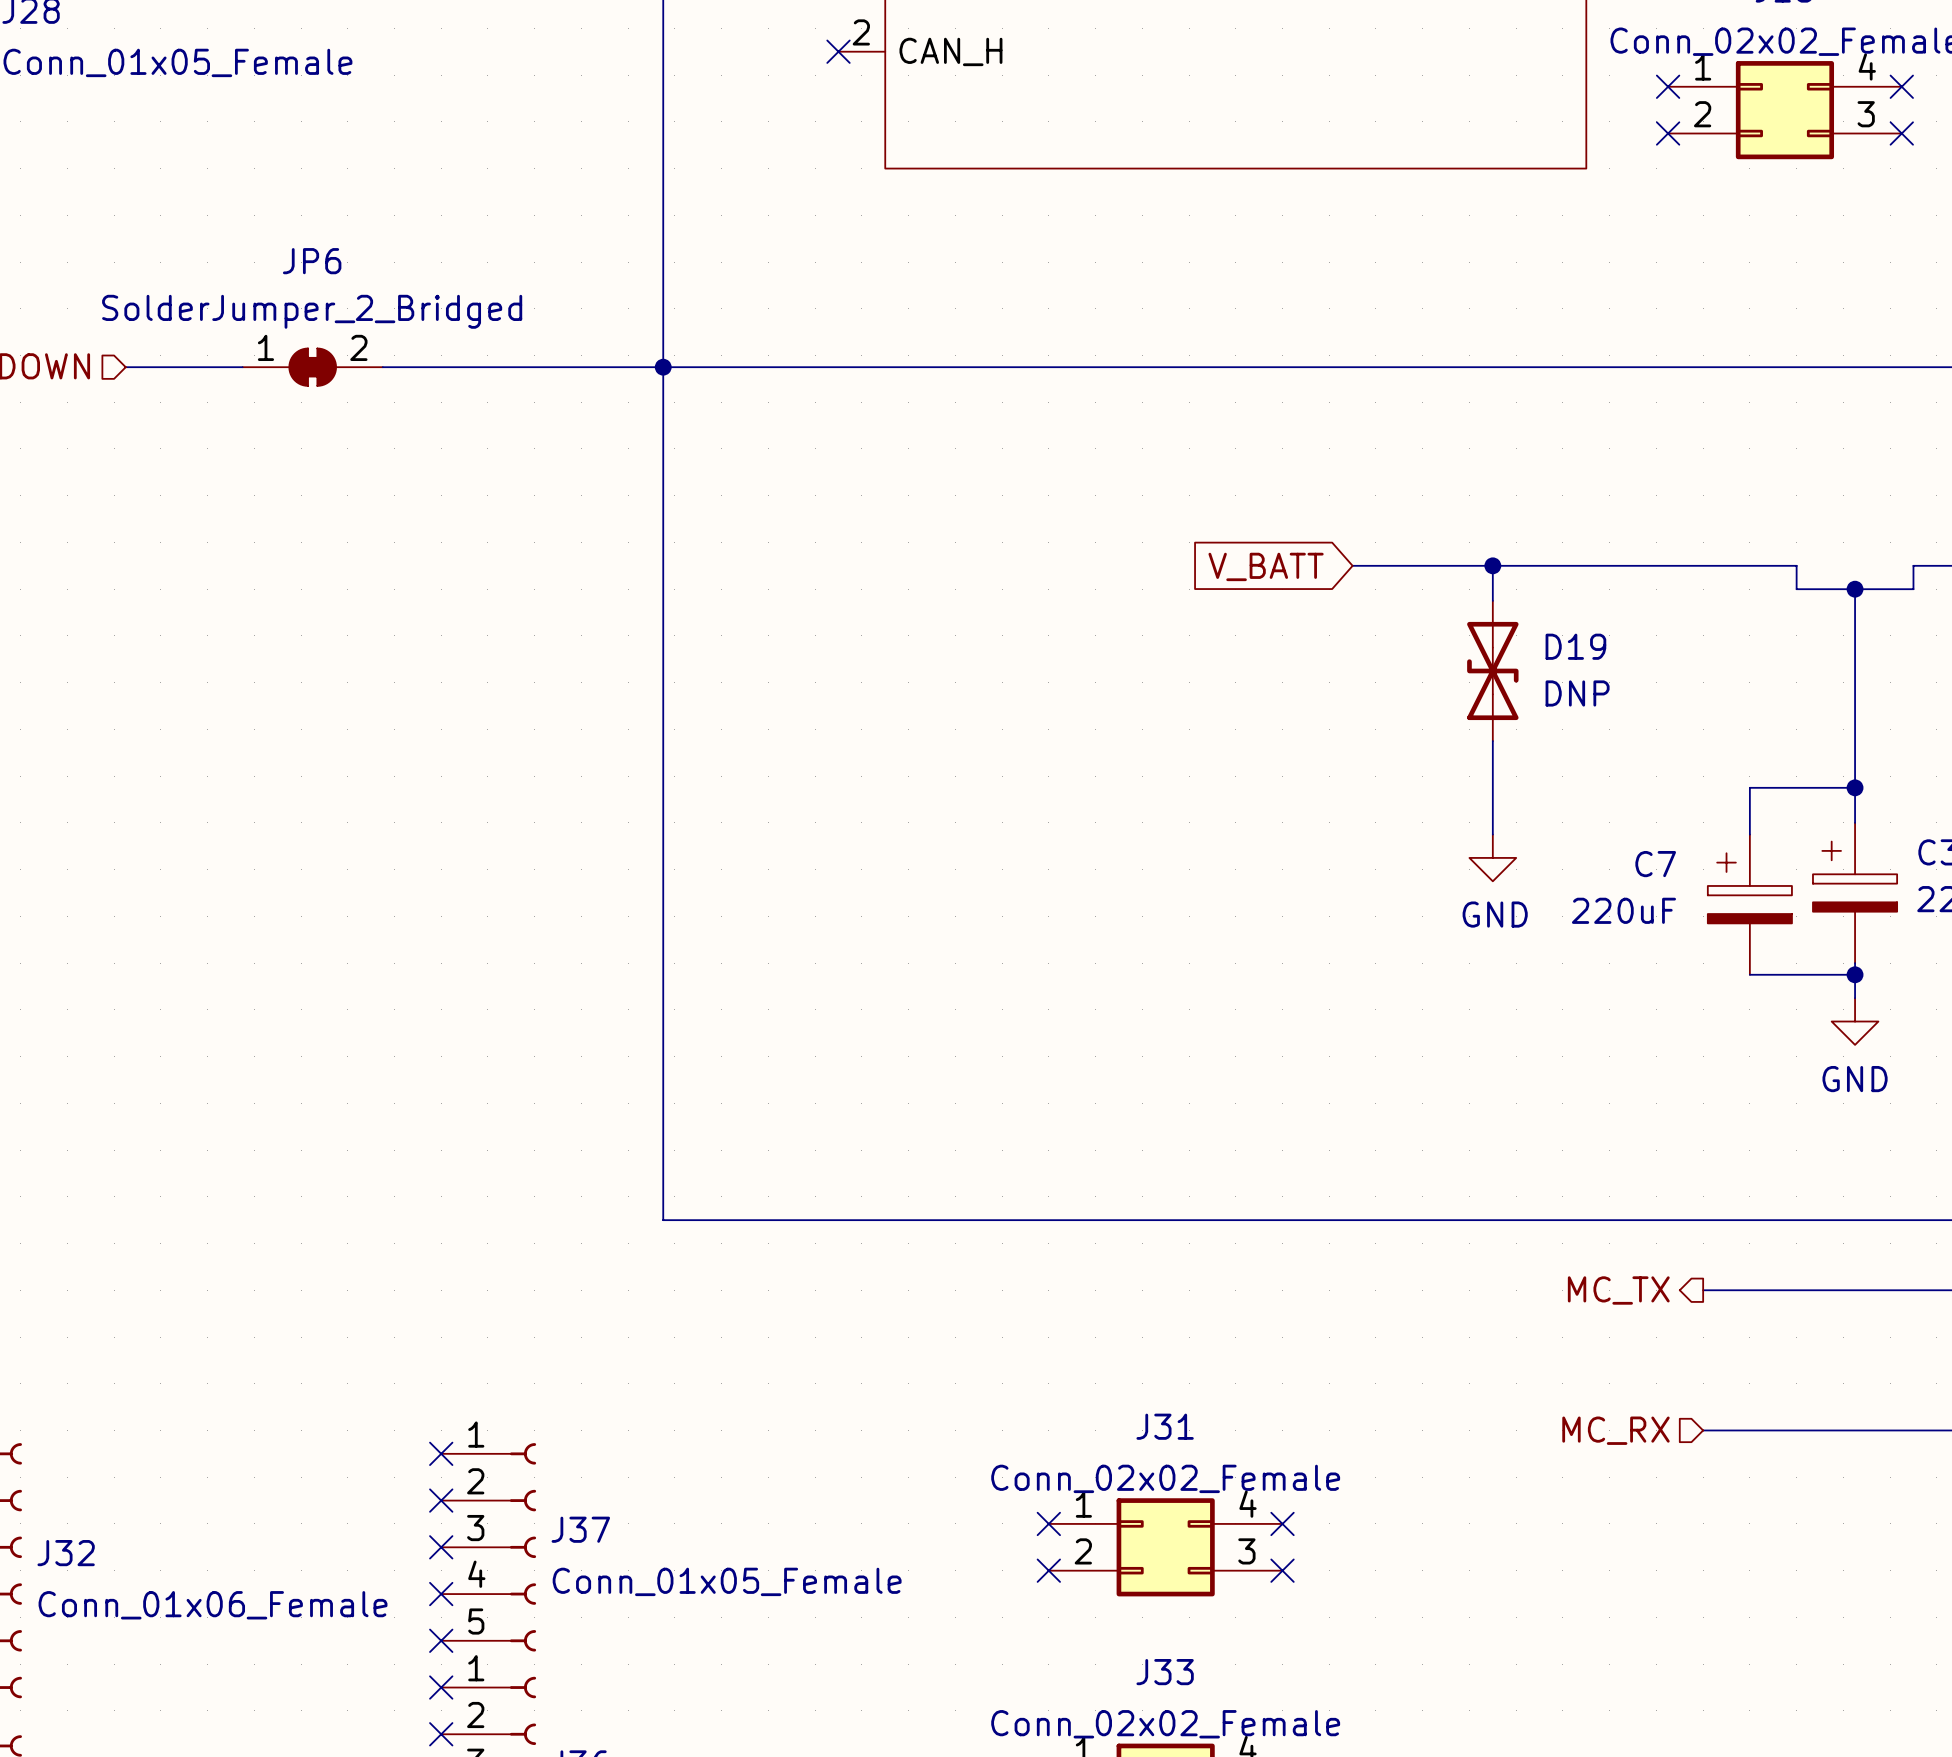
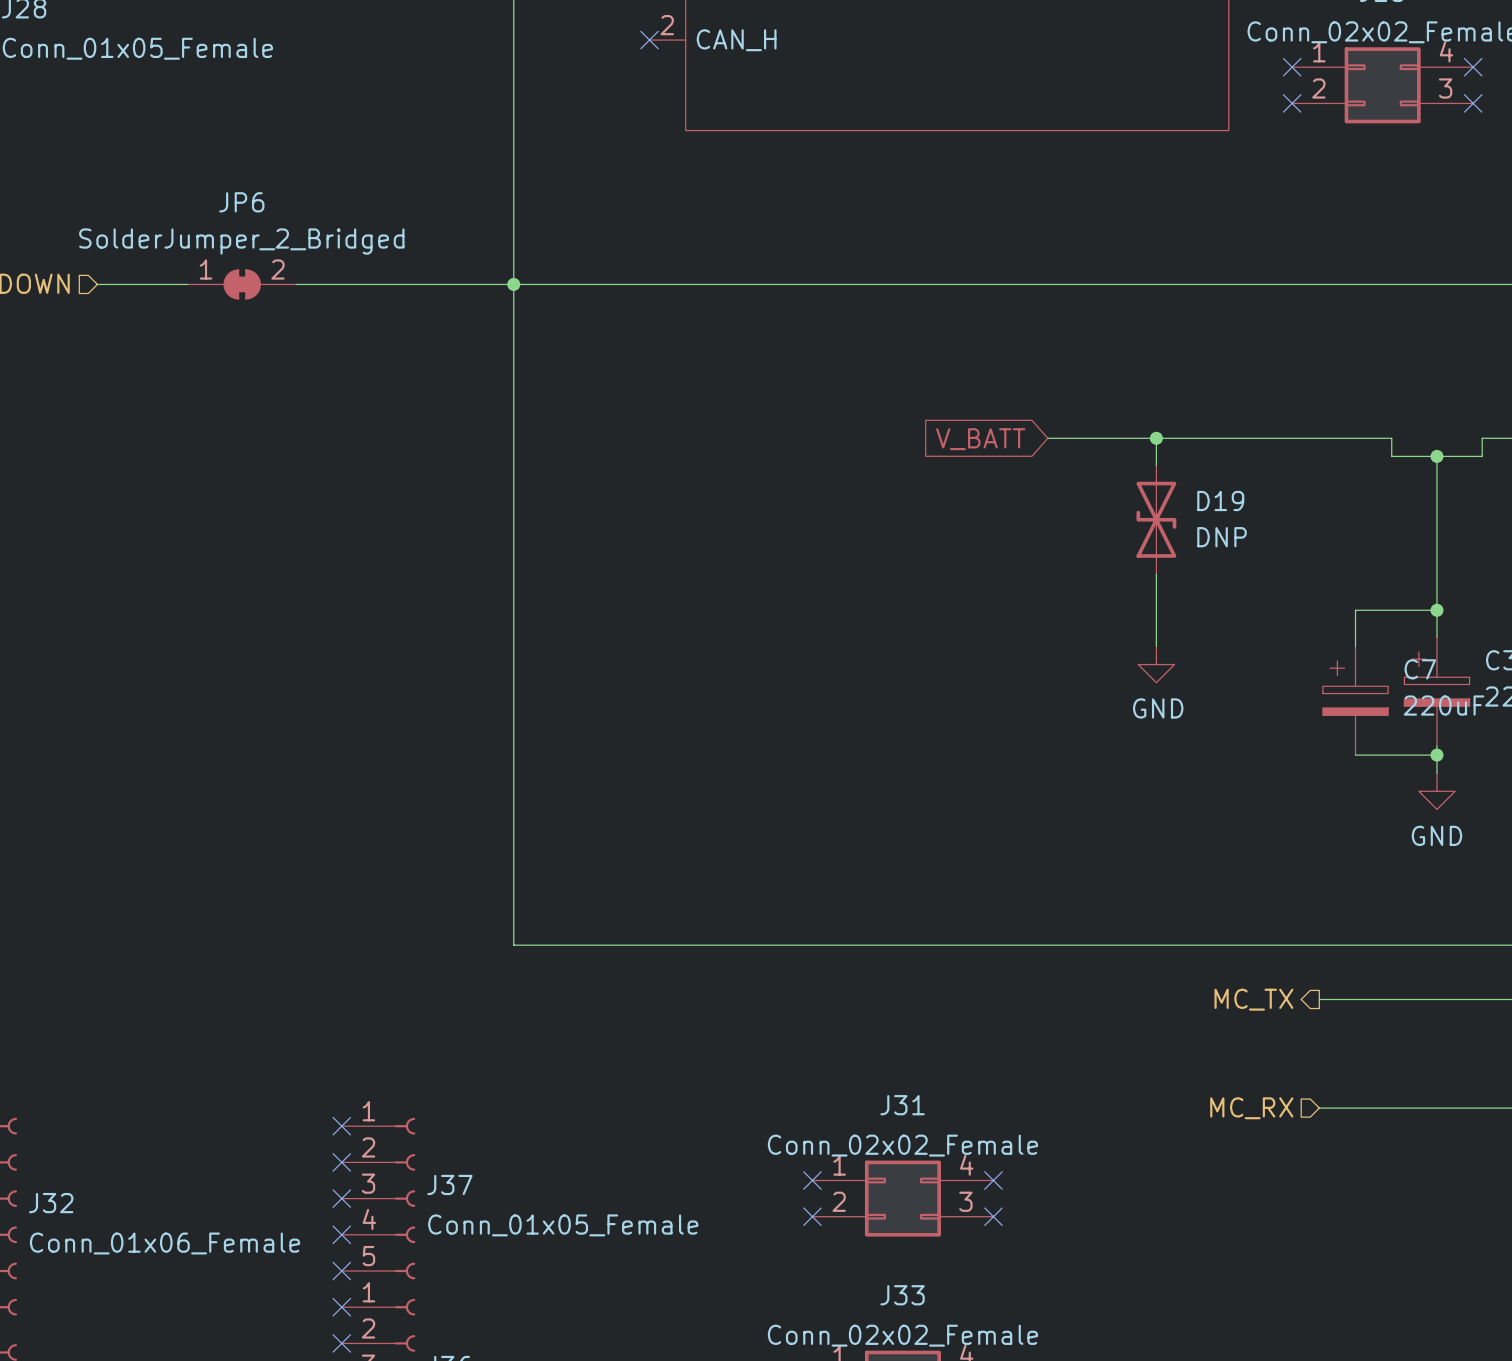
C7 name position: C7 (1655, 864) -> C7 (1420, 669)
C7 value position: 220uF (1623, 910) -> 220uF (1444, 705)

